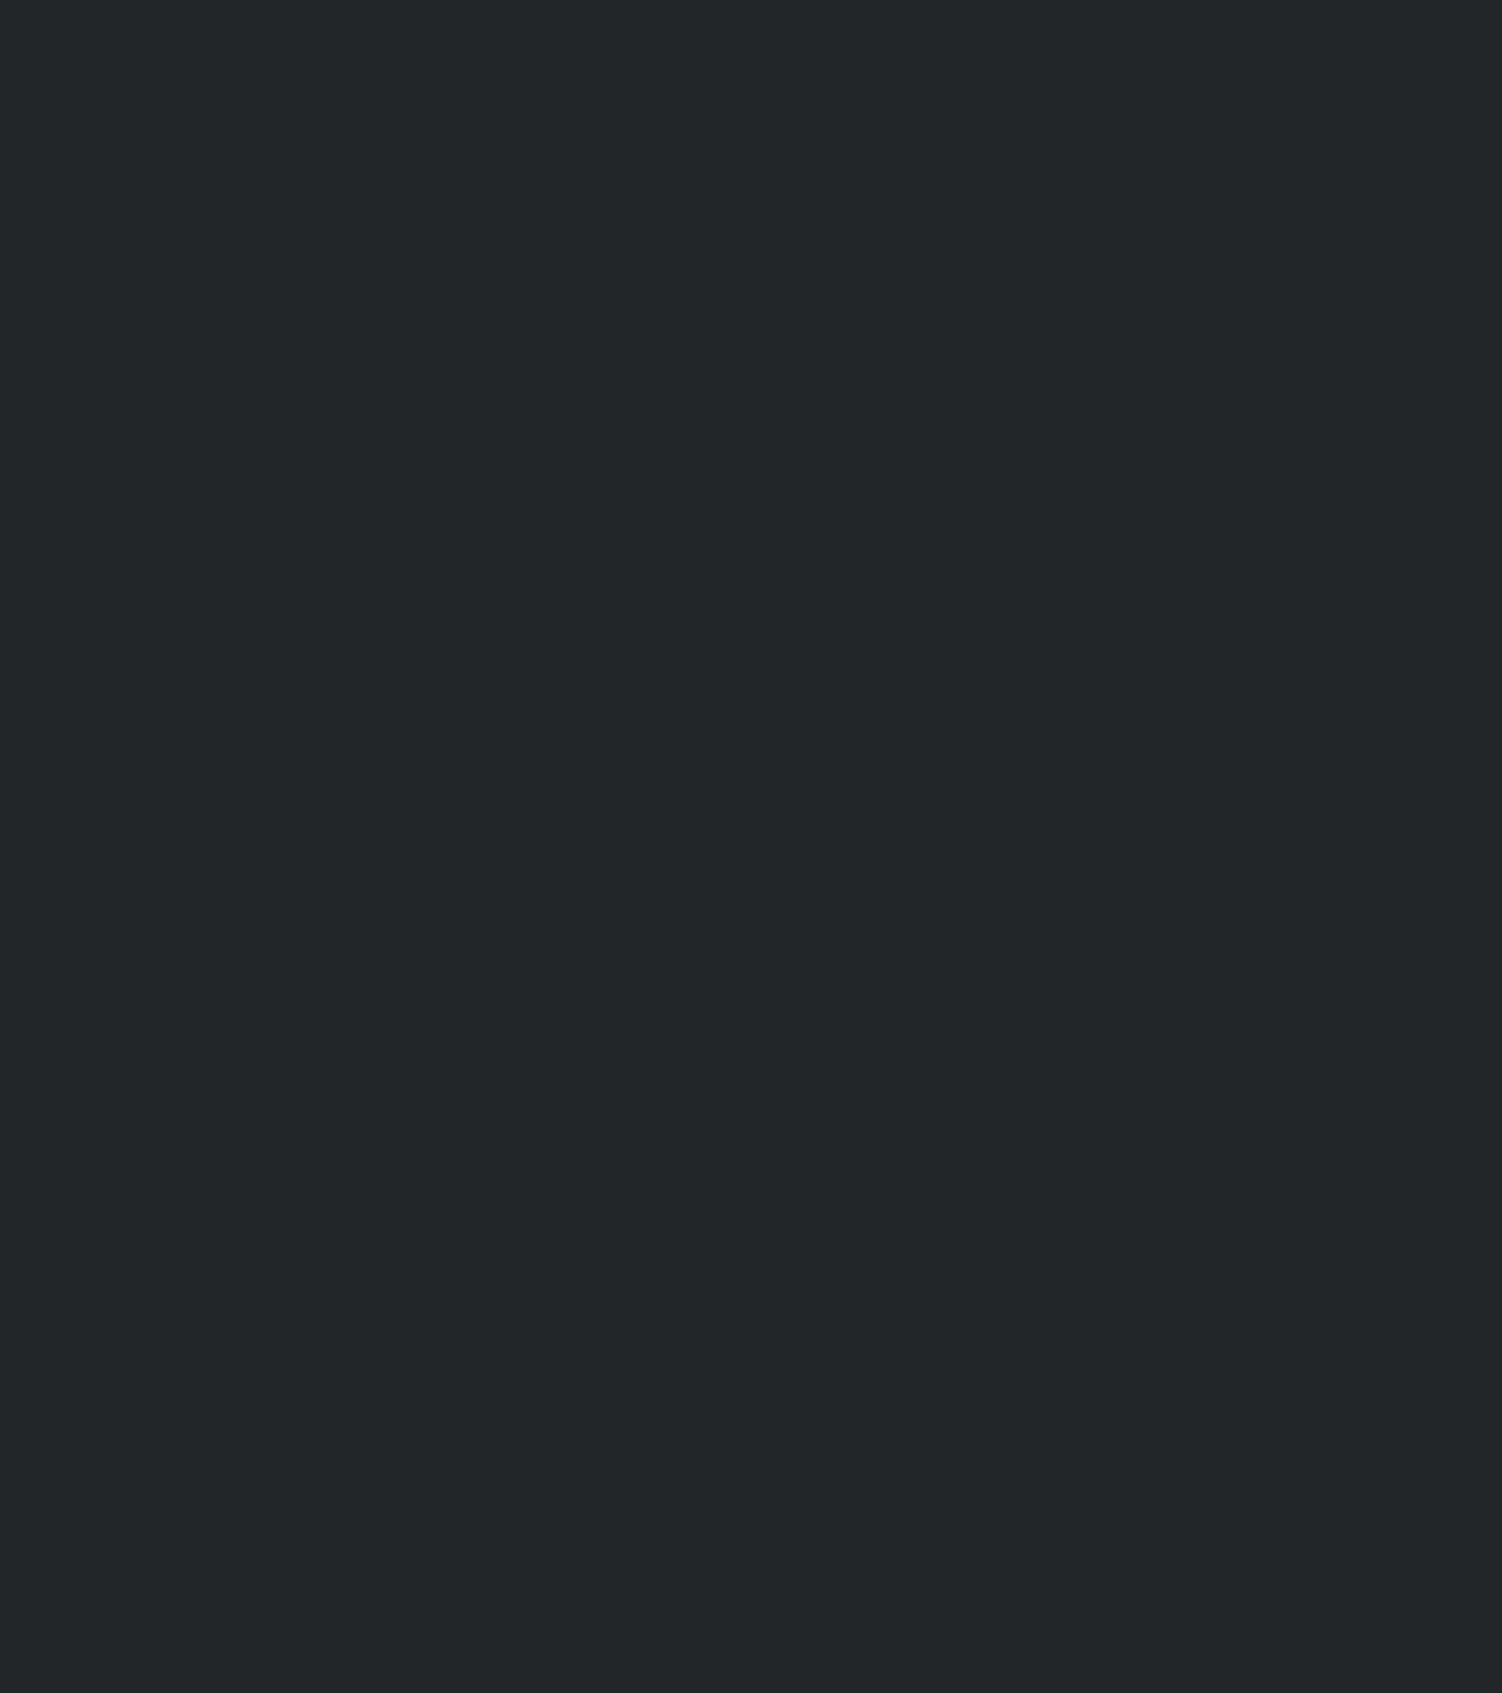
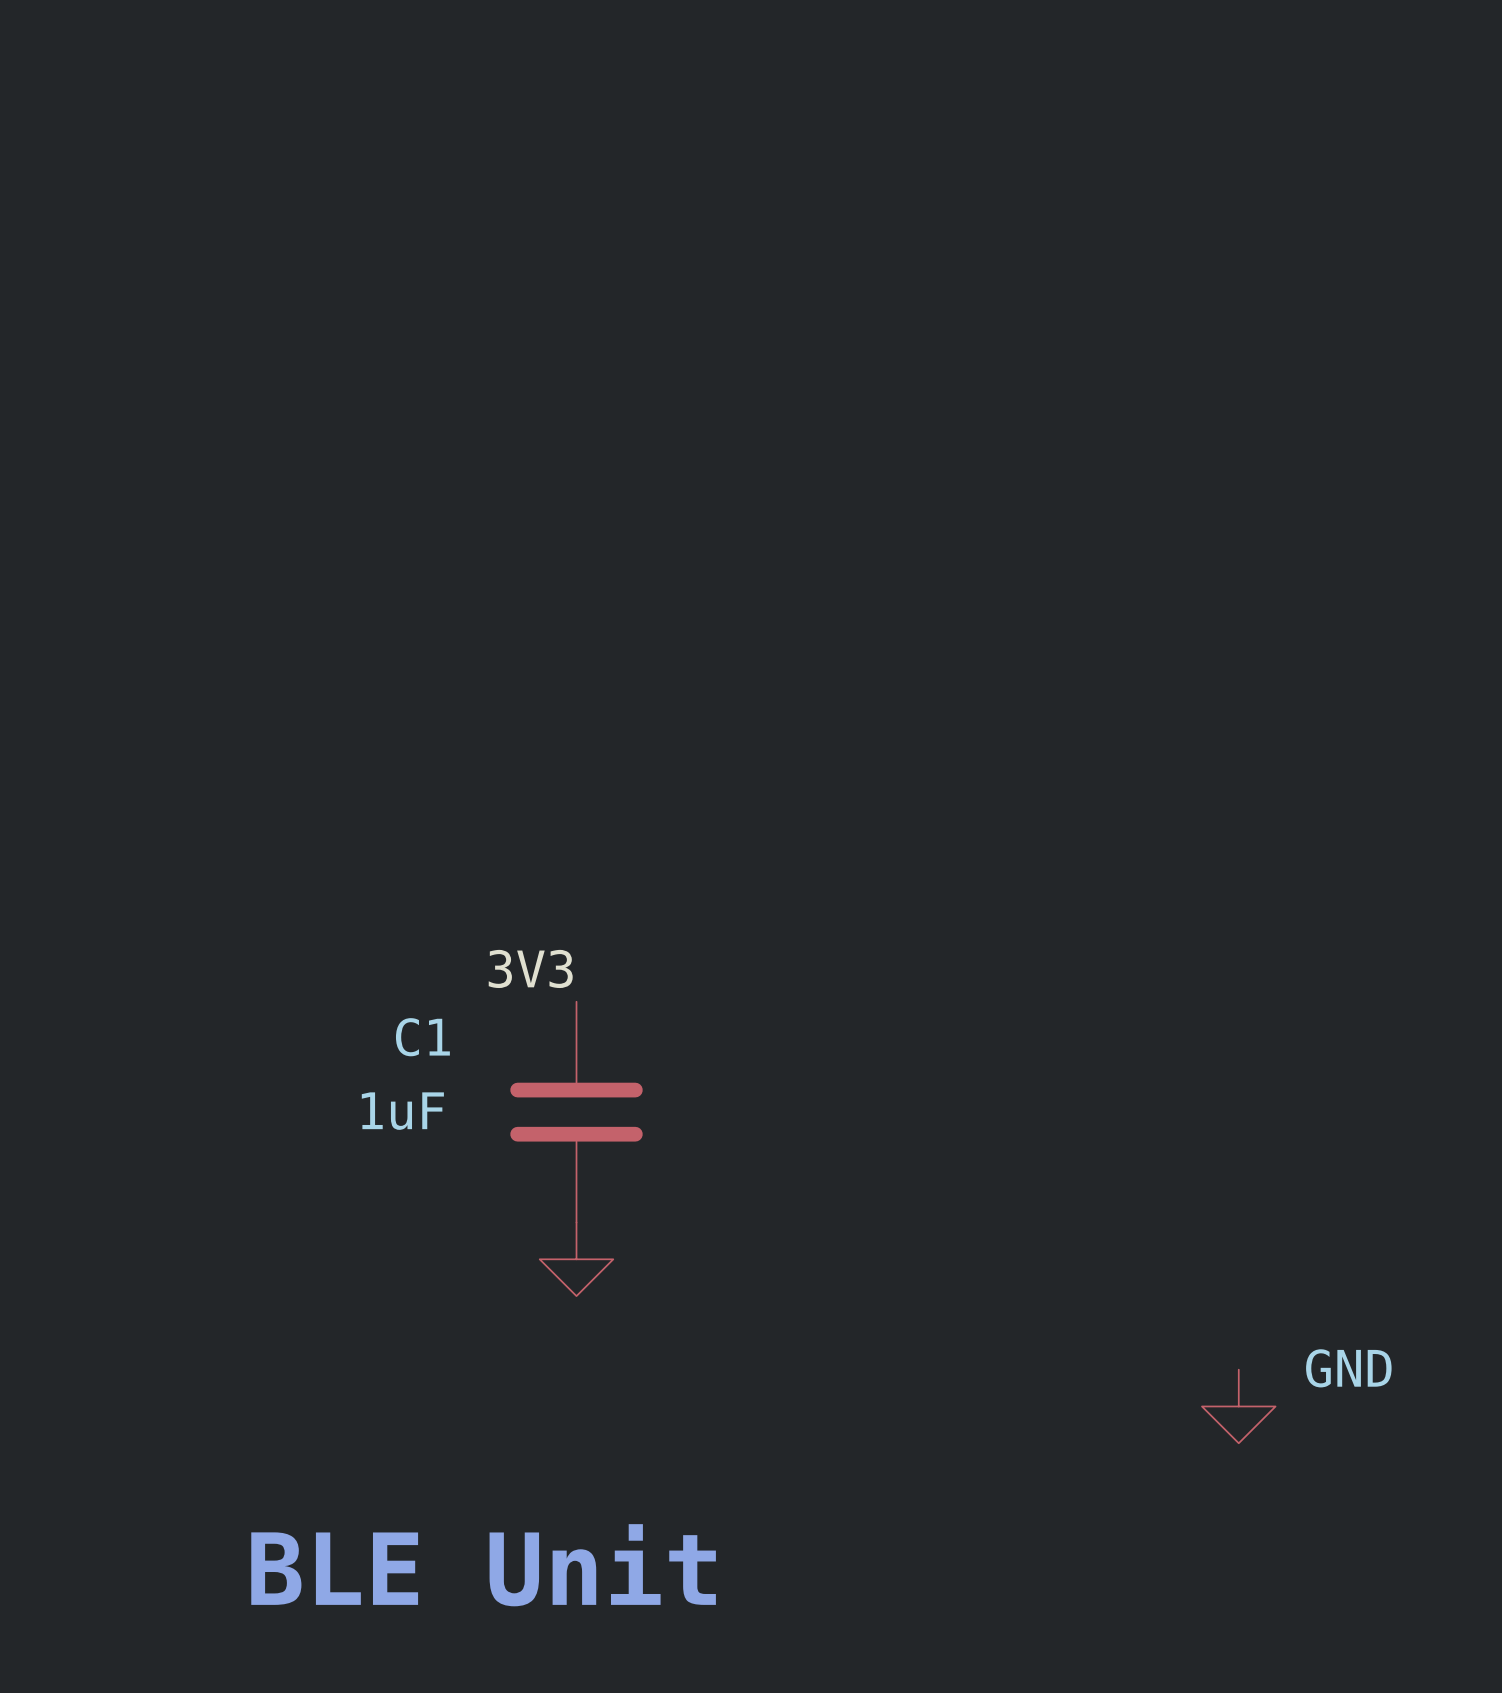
label: none -> 3V3 (530, 968)
C1: none -> 1uF (576, 1112)
power symbol: none -> (576, 1259)
power symbol: none -> GND (1238, 1406)
text: none -> BLE Unit (483, 1565)

